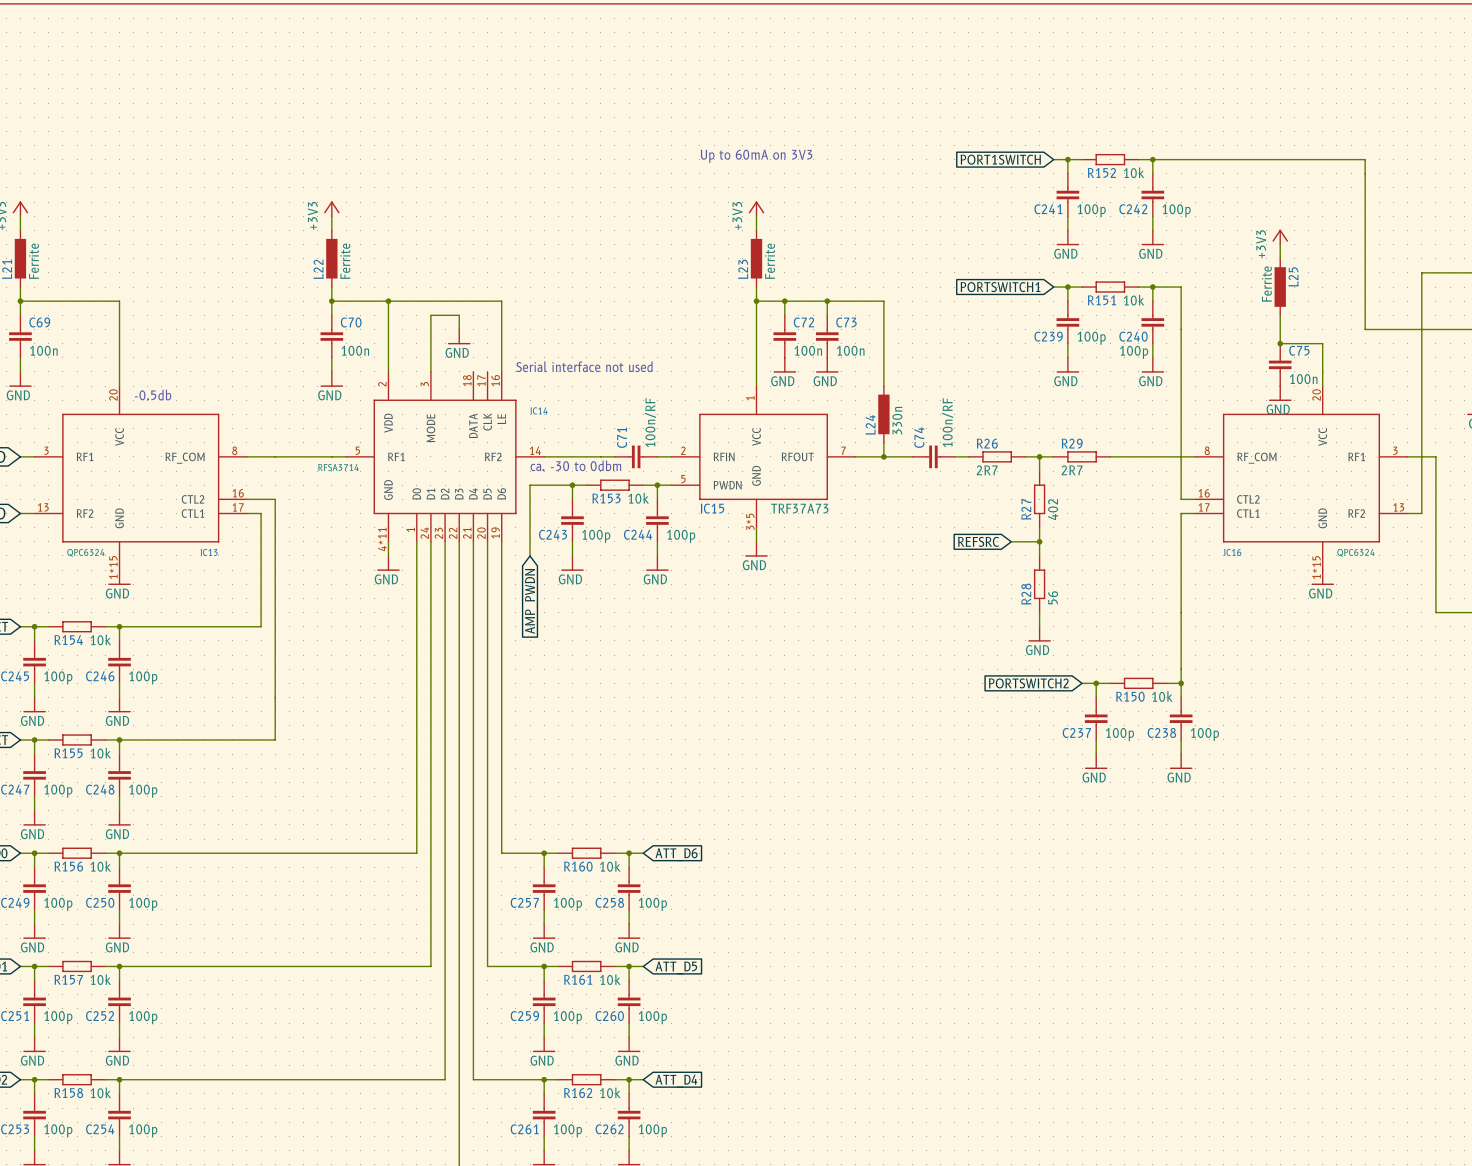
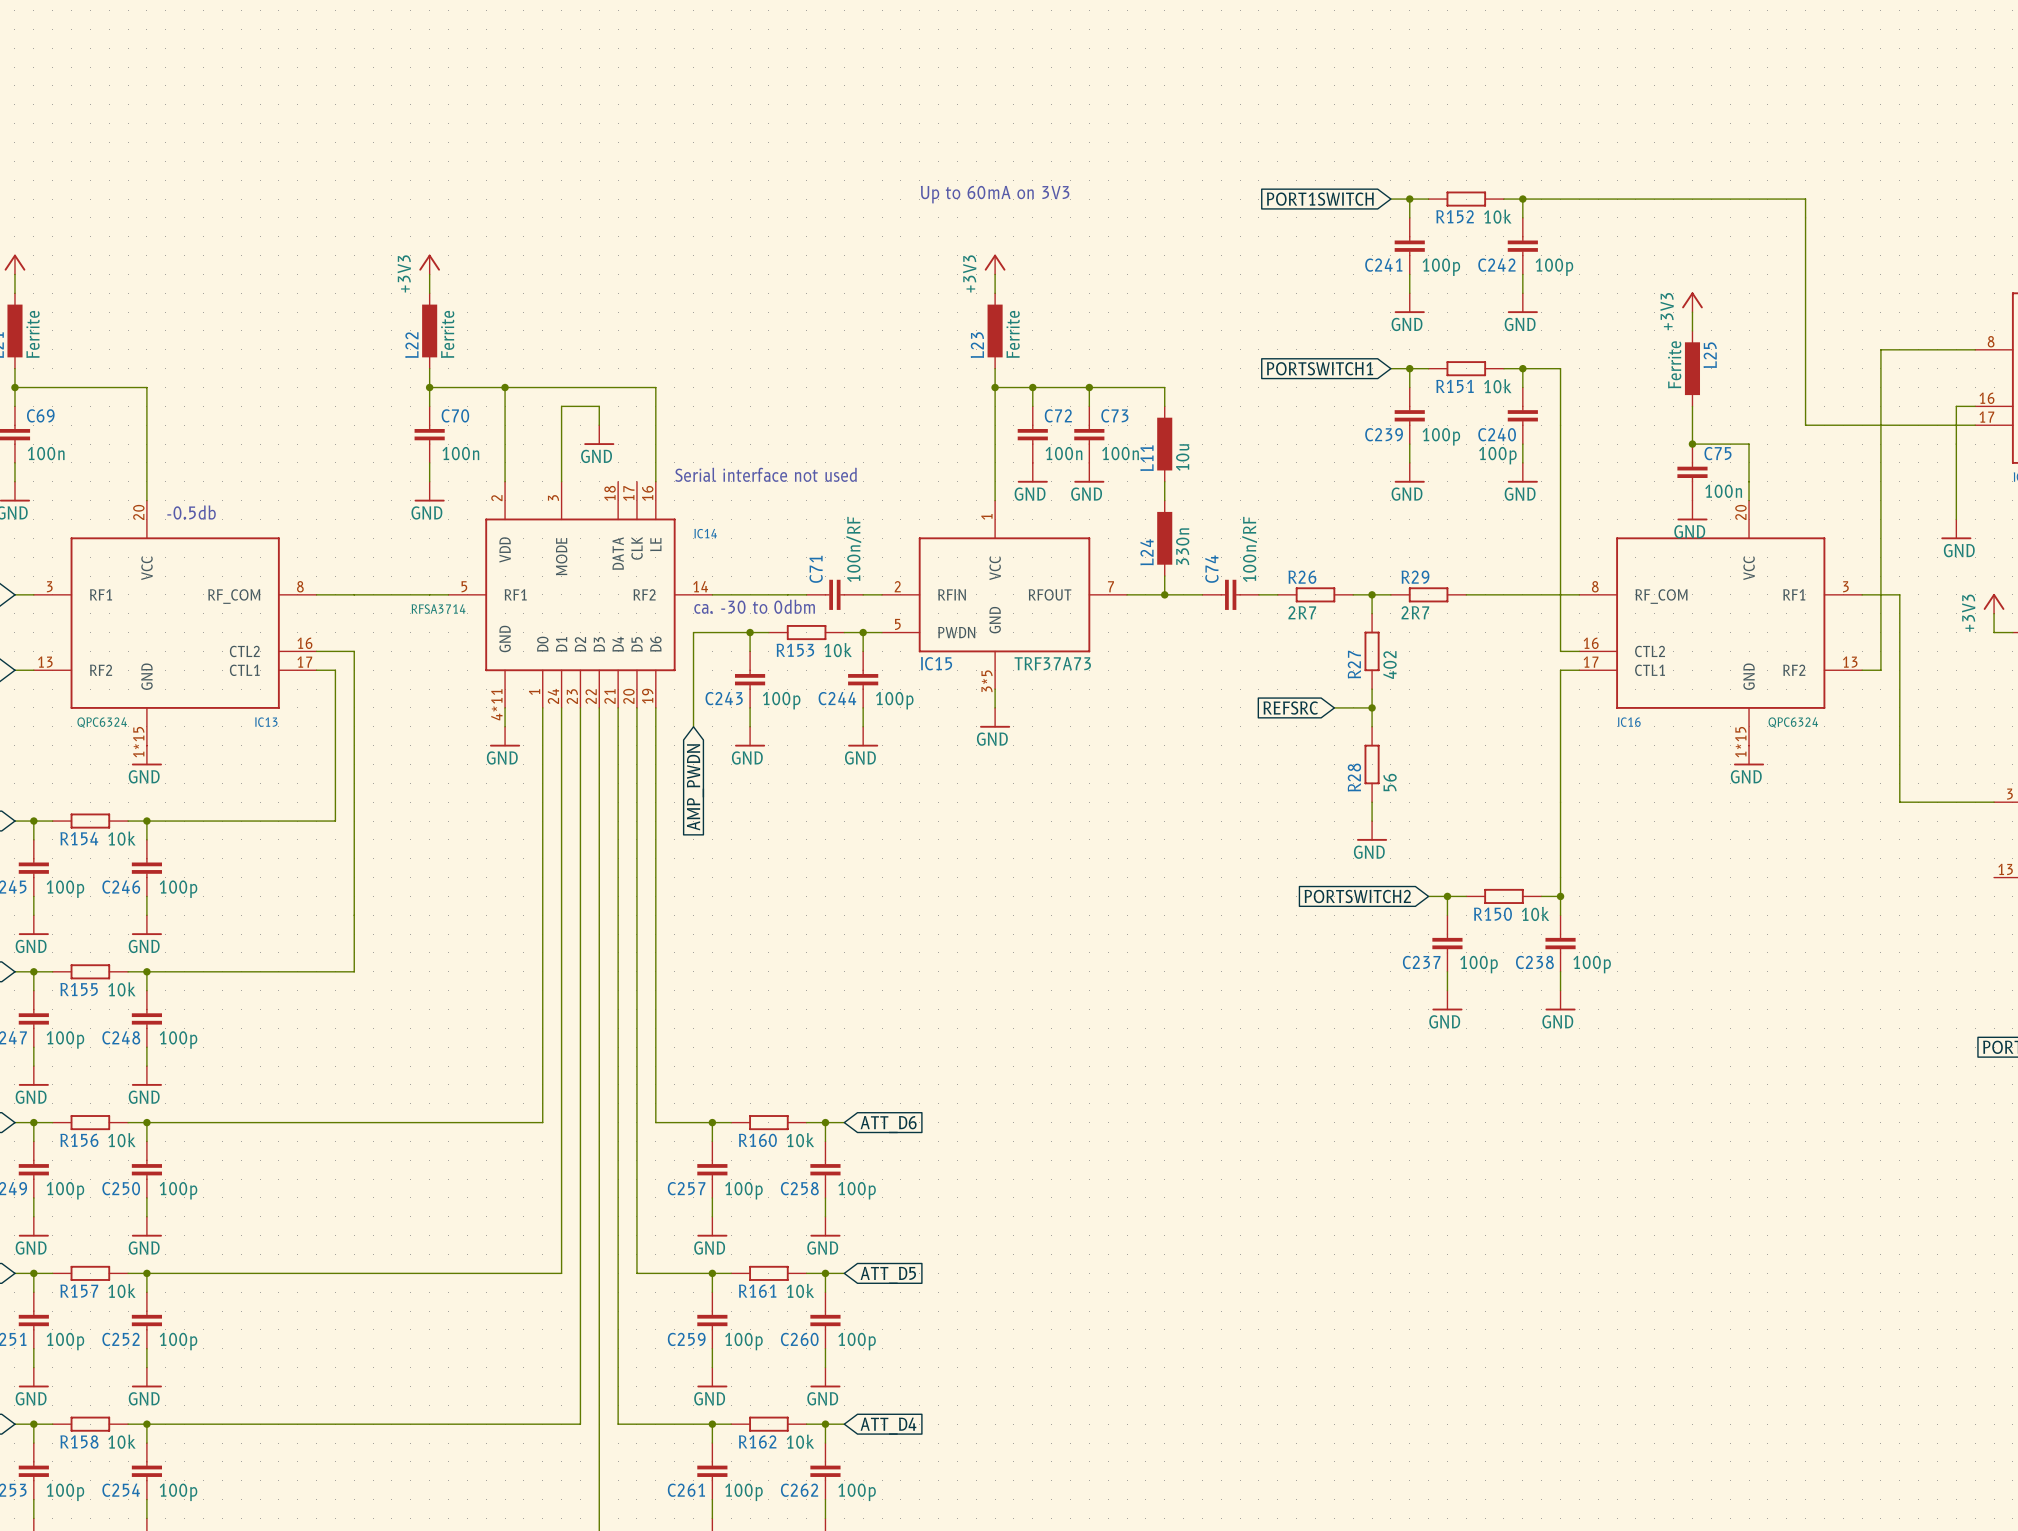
L11: none -> 10u (1164, 444)

